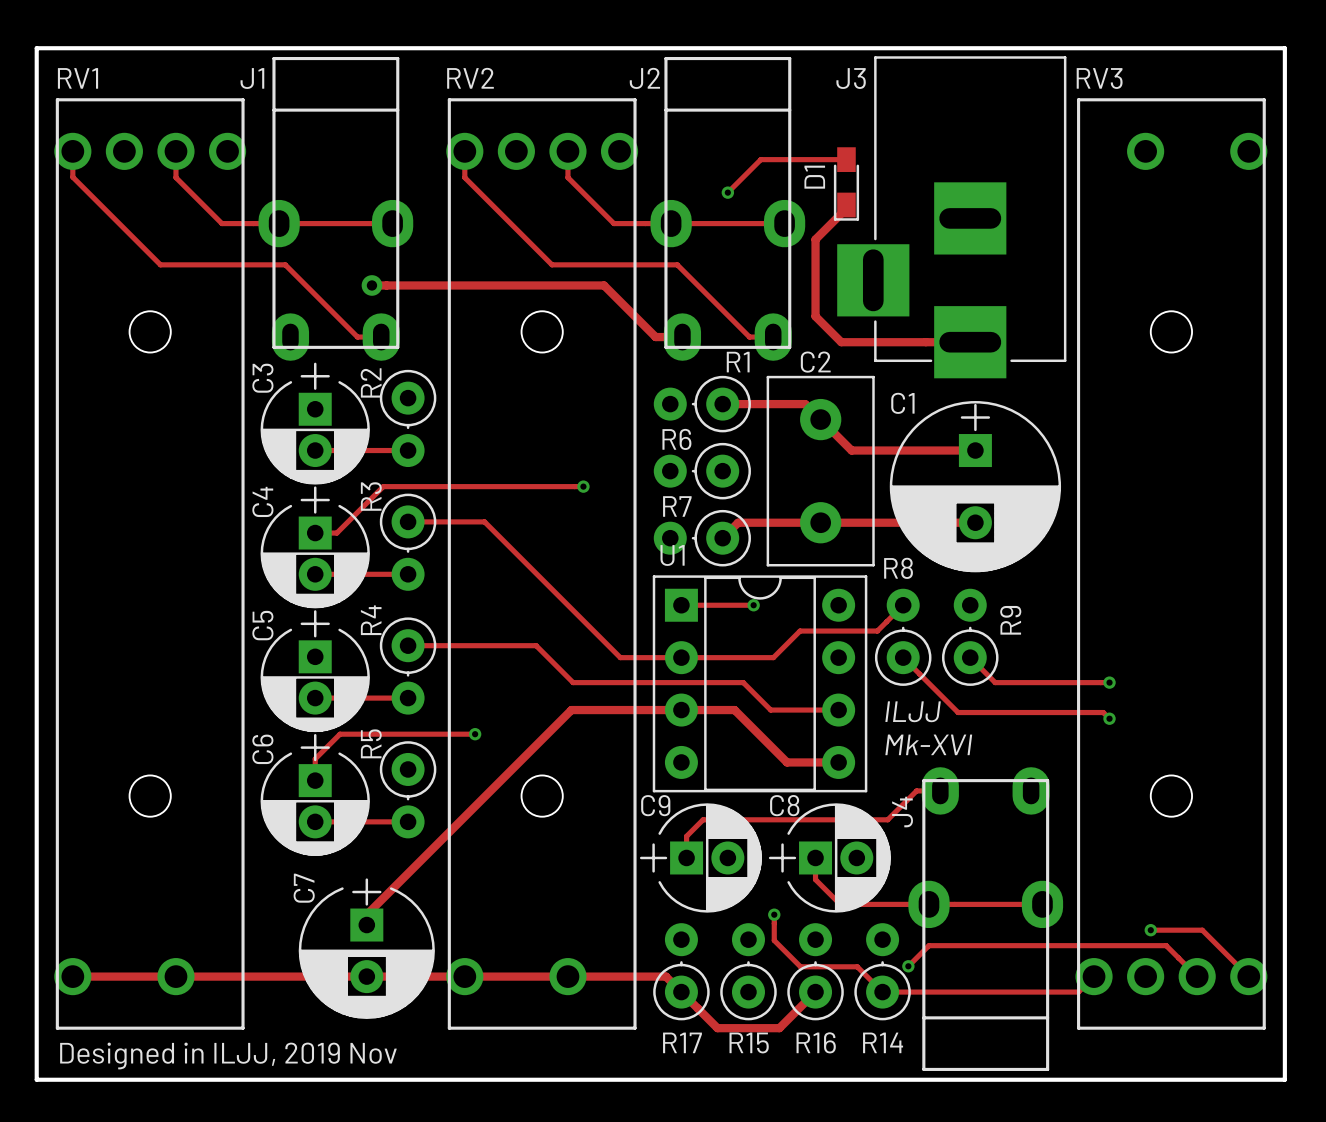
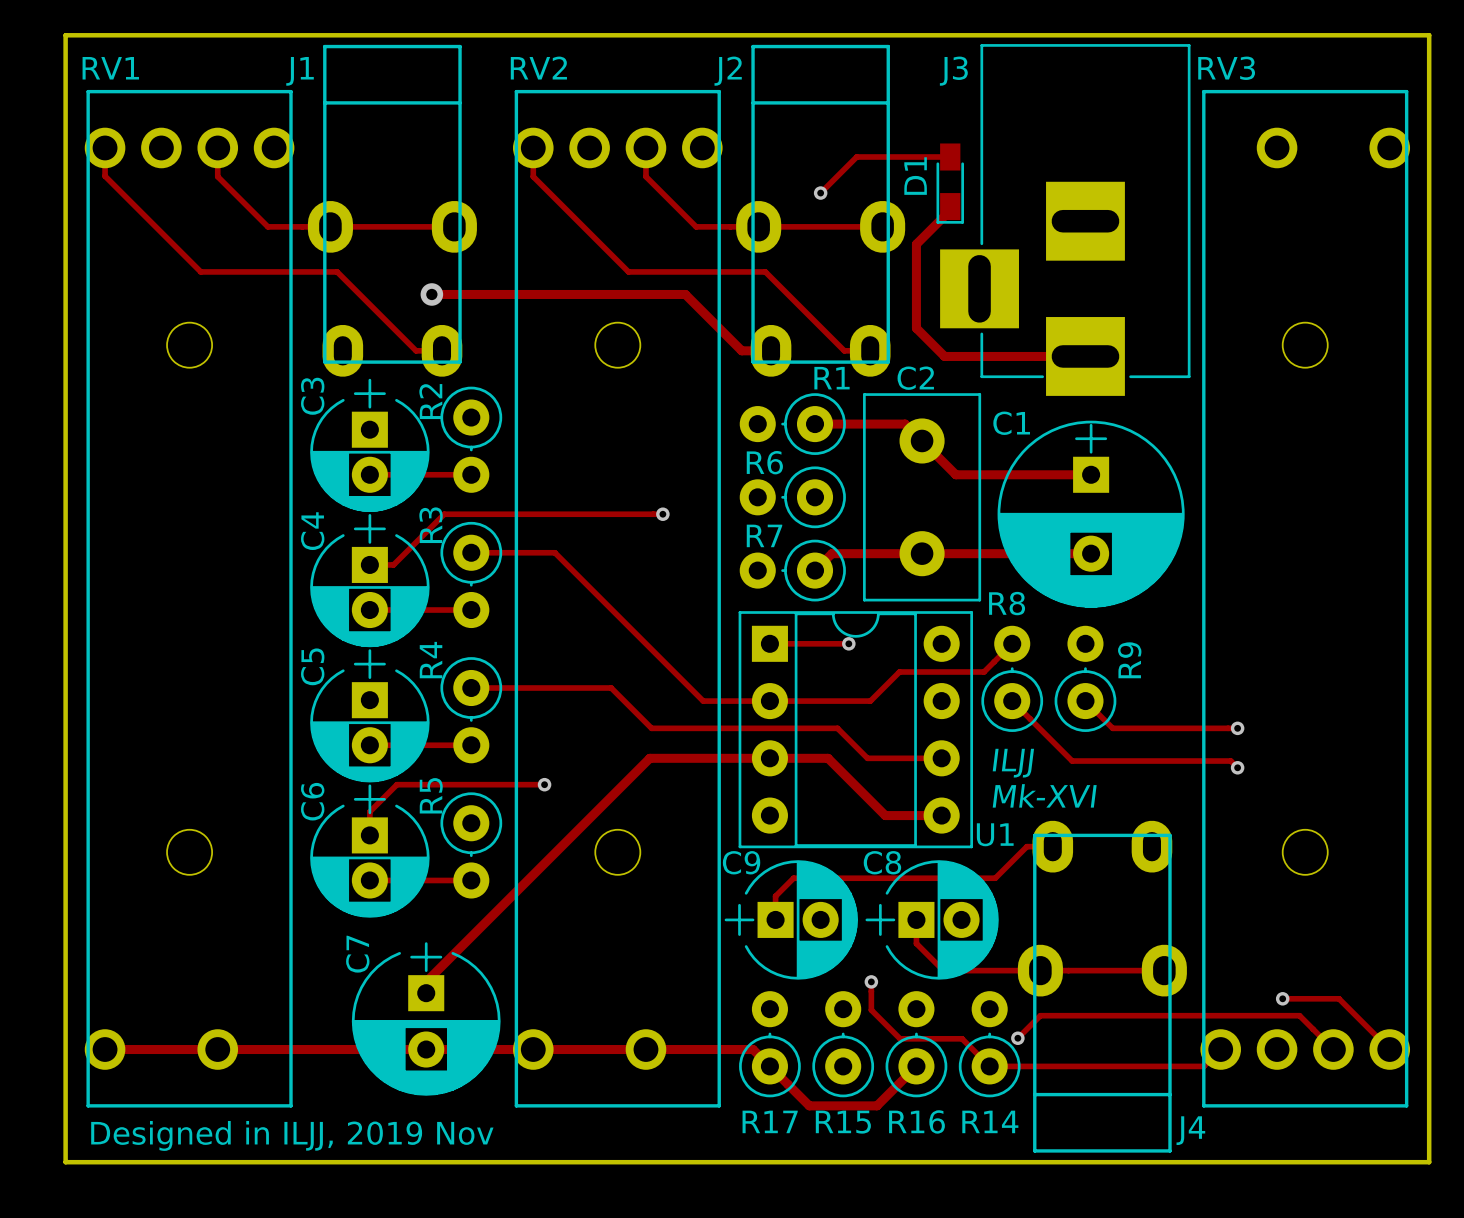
U1 name position: U1 (672, 555) -> U1 (995, 834)
J4 name rotation: 0° (902, 812) -> 90° clockwise (1190, 1130)
J4 name position: J4 (902, 812) -> J4 (1190, 1130)

